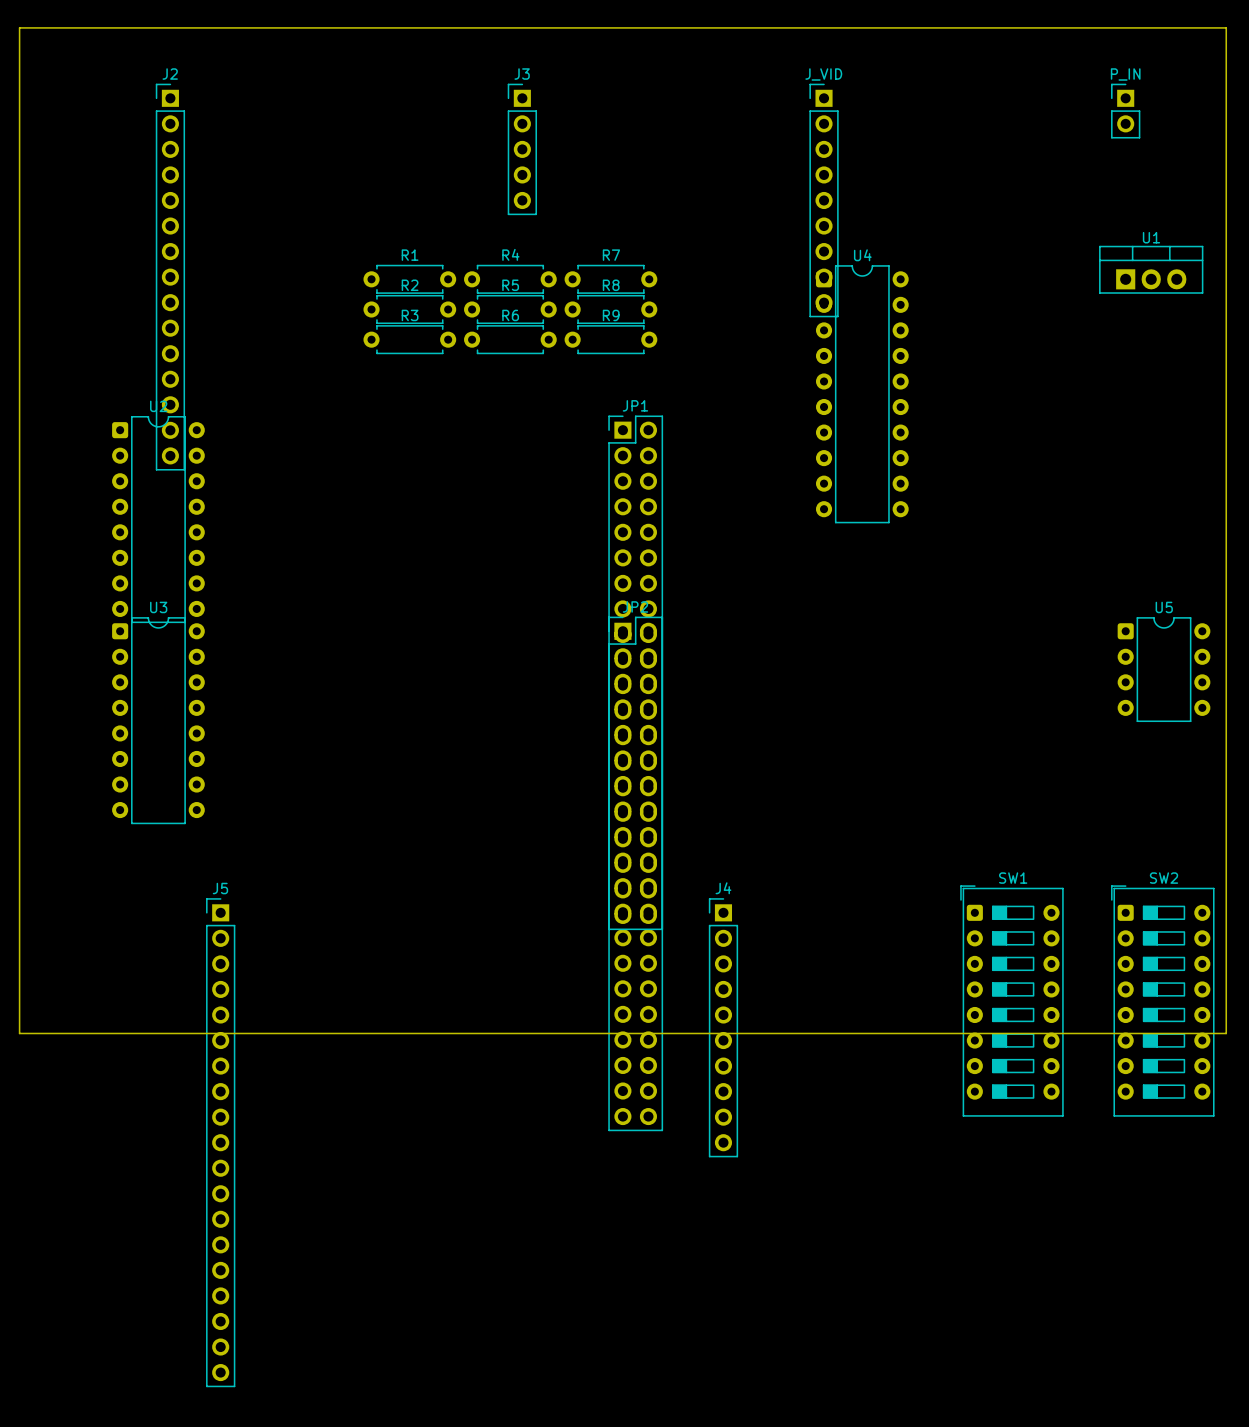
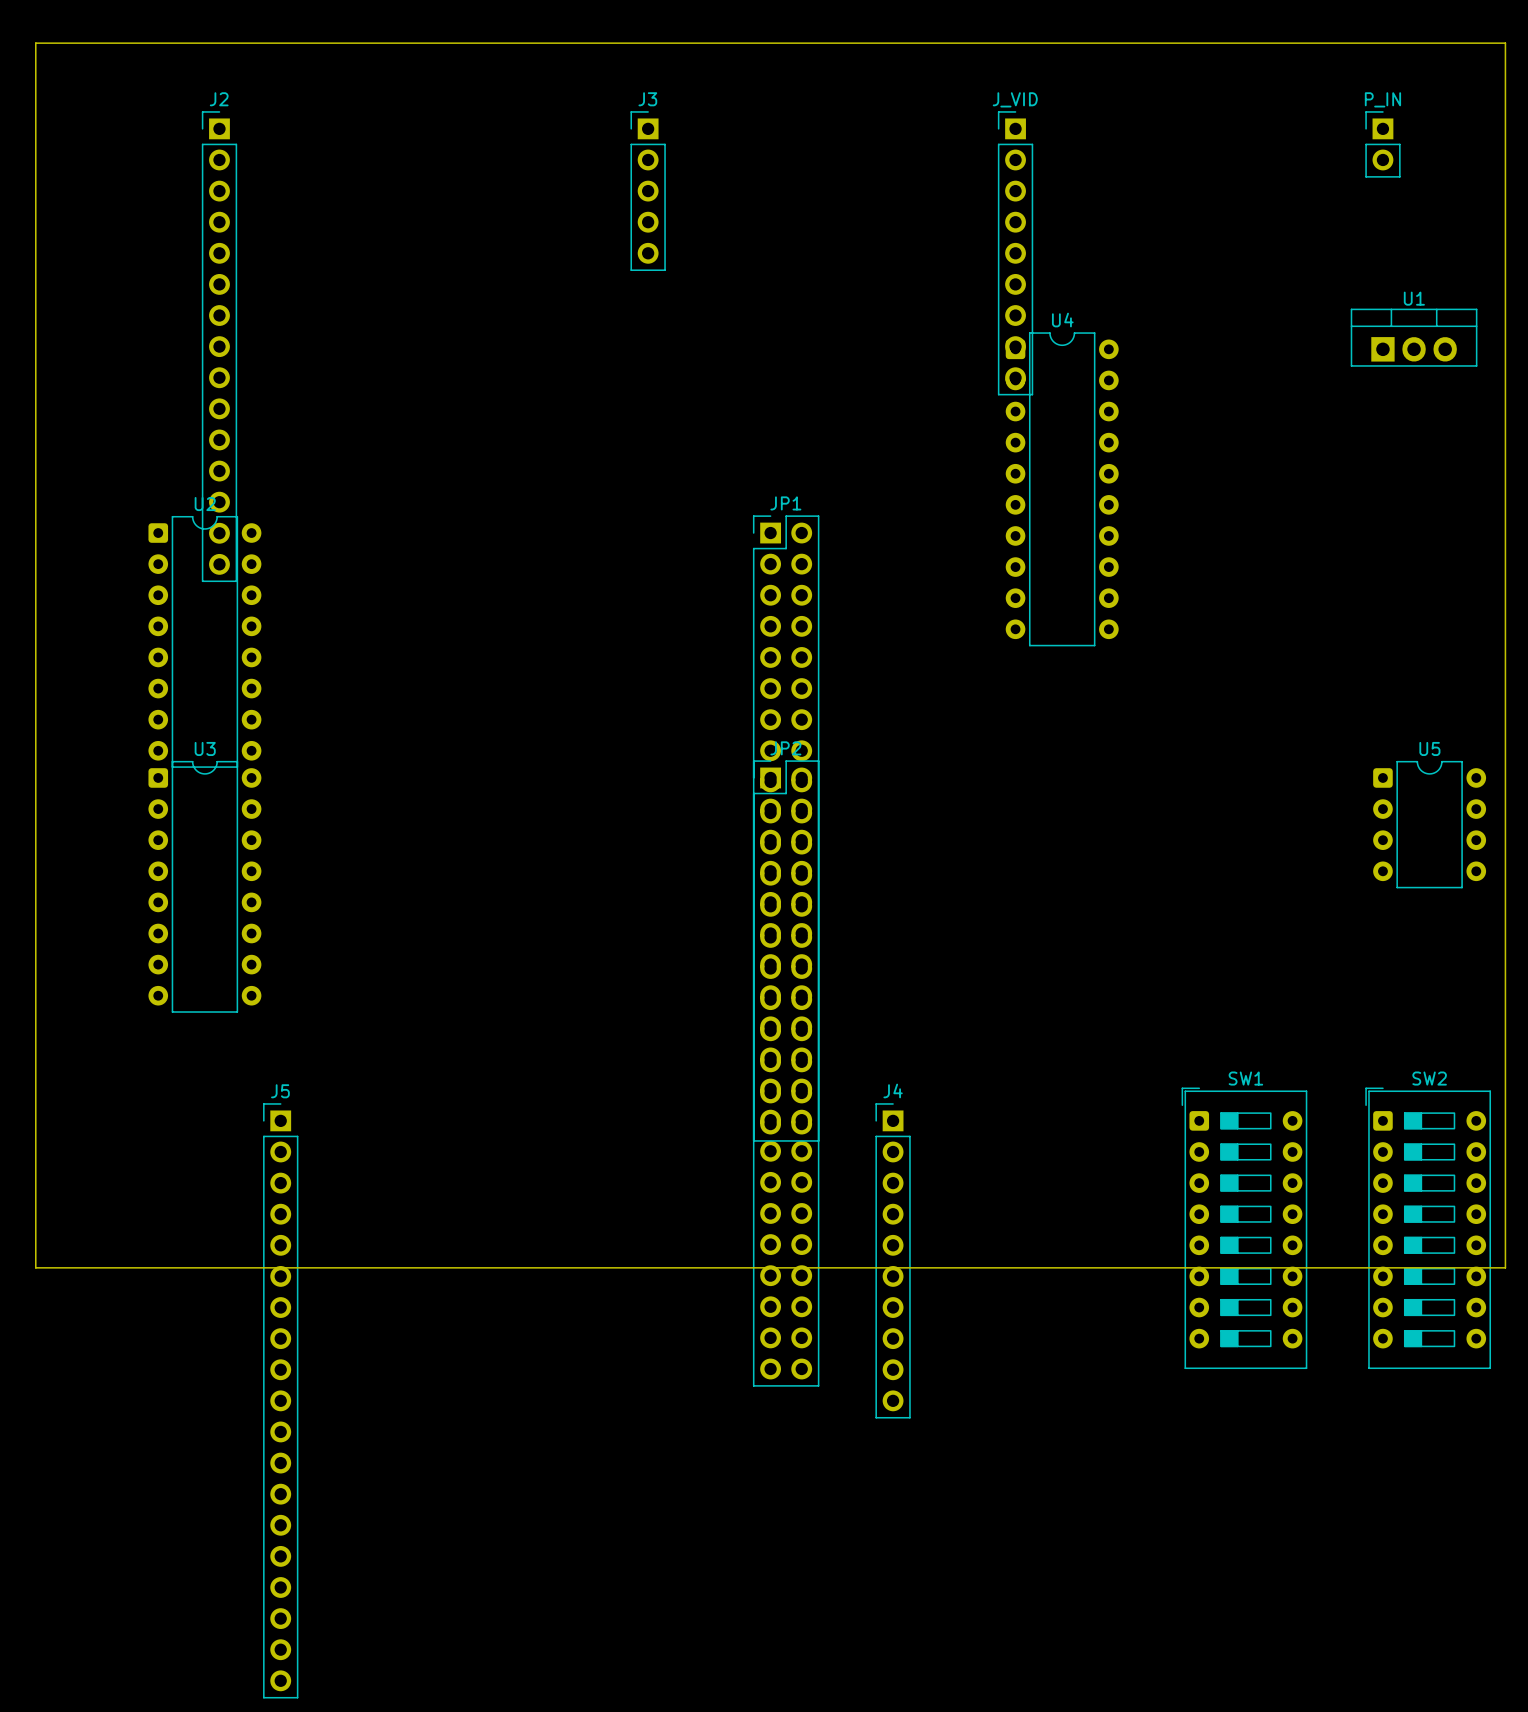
R1: (409, 279) -> none
R4: (510, 279) -> none
R7: (610, 279) -> none
R2: (409, 309) -> none
R5: (510, 309) -> none
R8: (610, 309) -> none
R3: (409, 339) -> none
R6: (510, 339) -> none
R9: (610, 339) -> none

